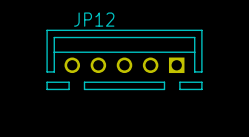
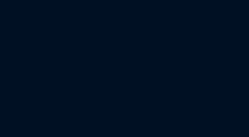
JP12: (124, 59) -> none

